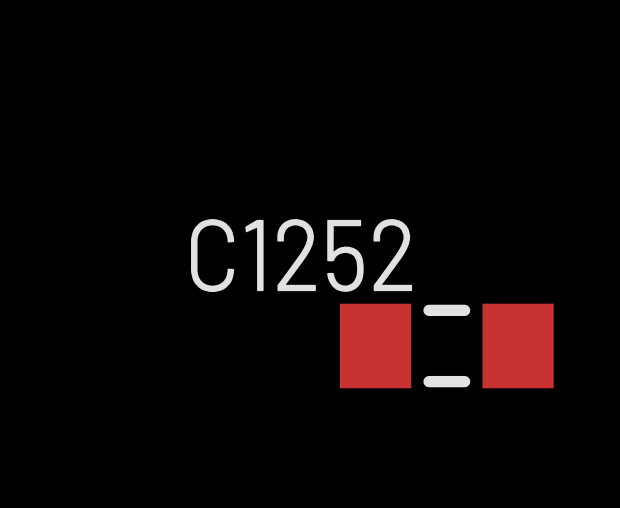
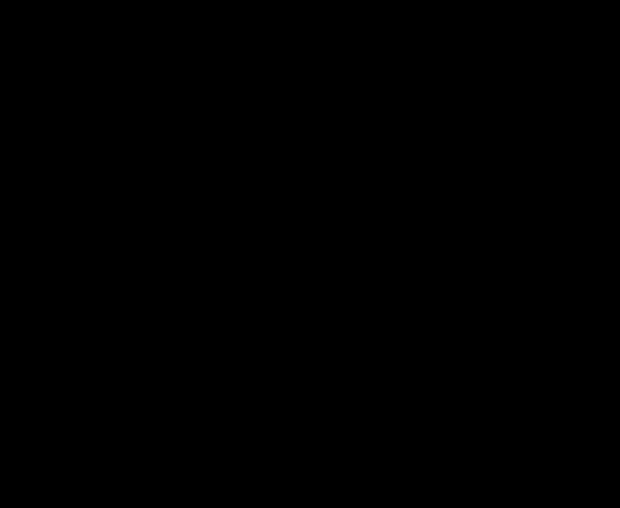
C1252: (446, 345) -> none

